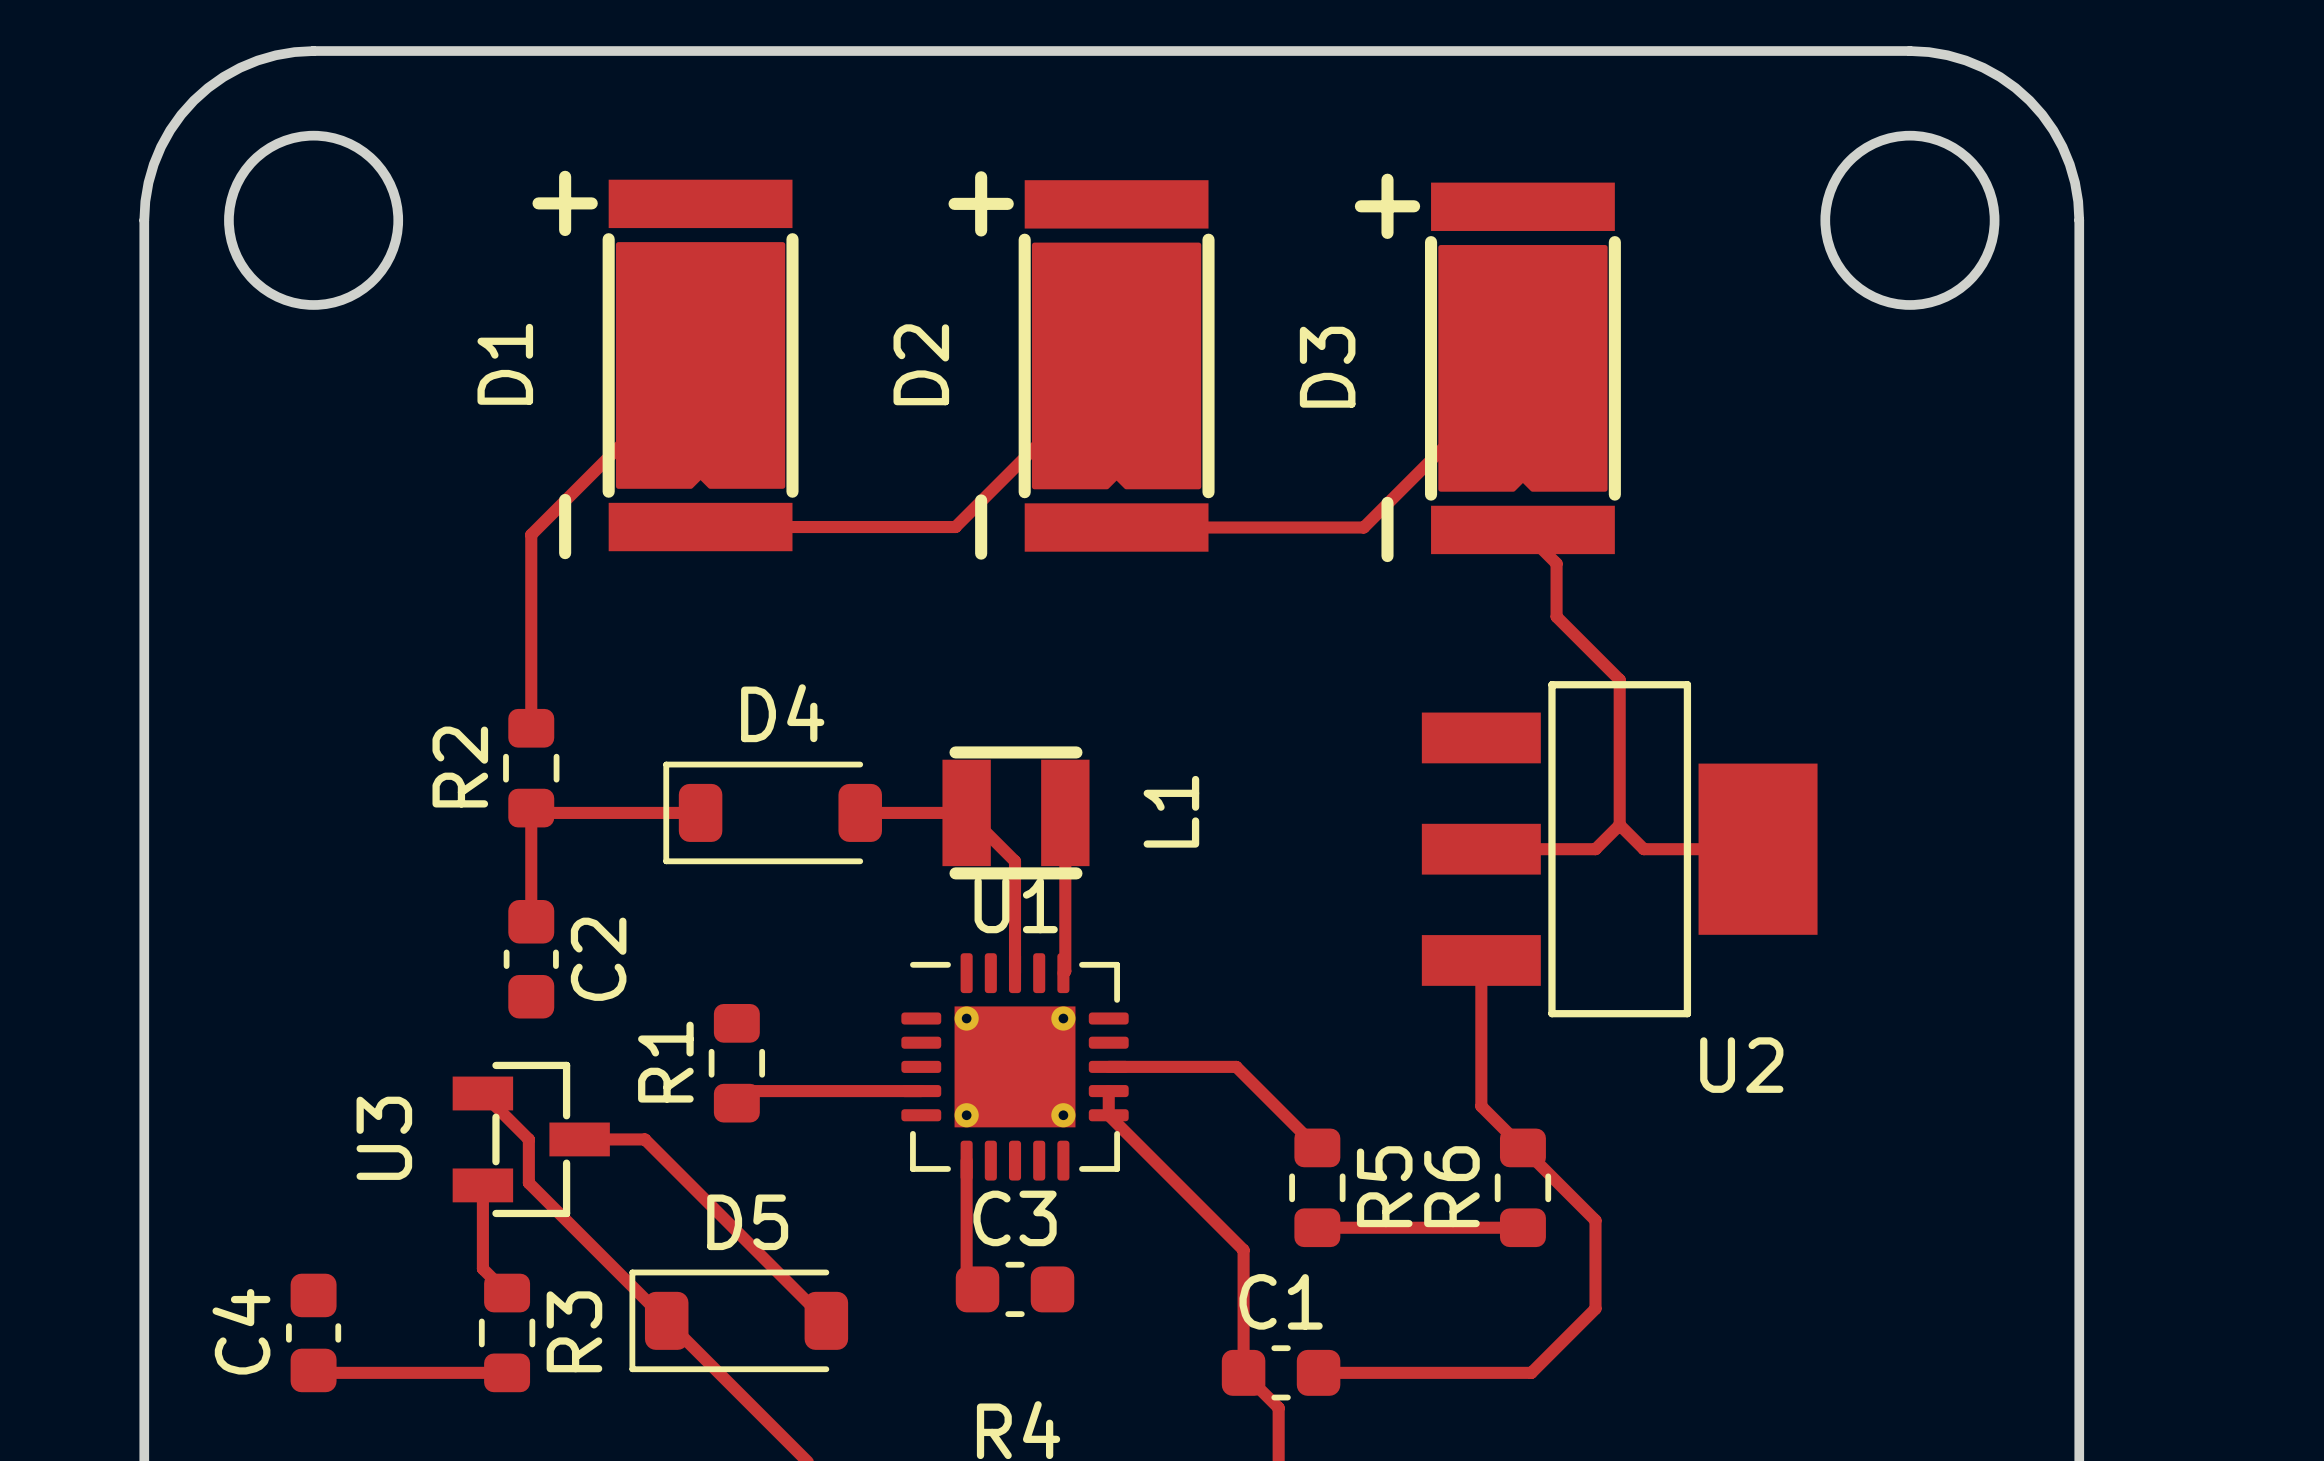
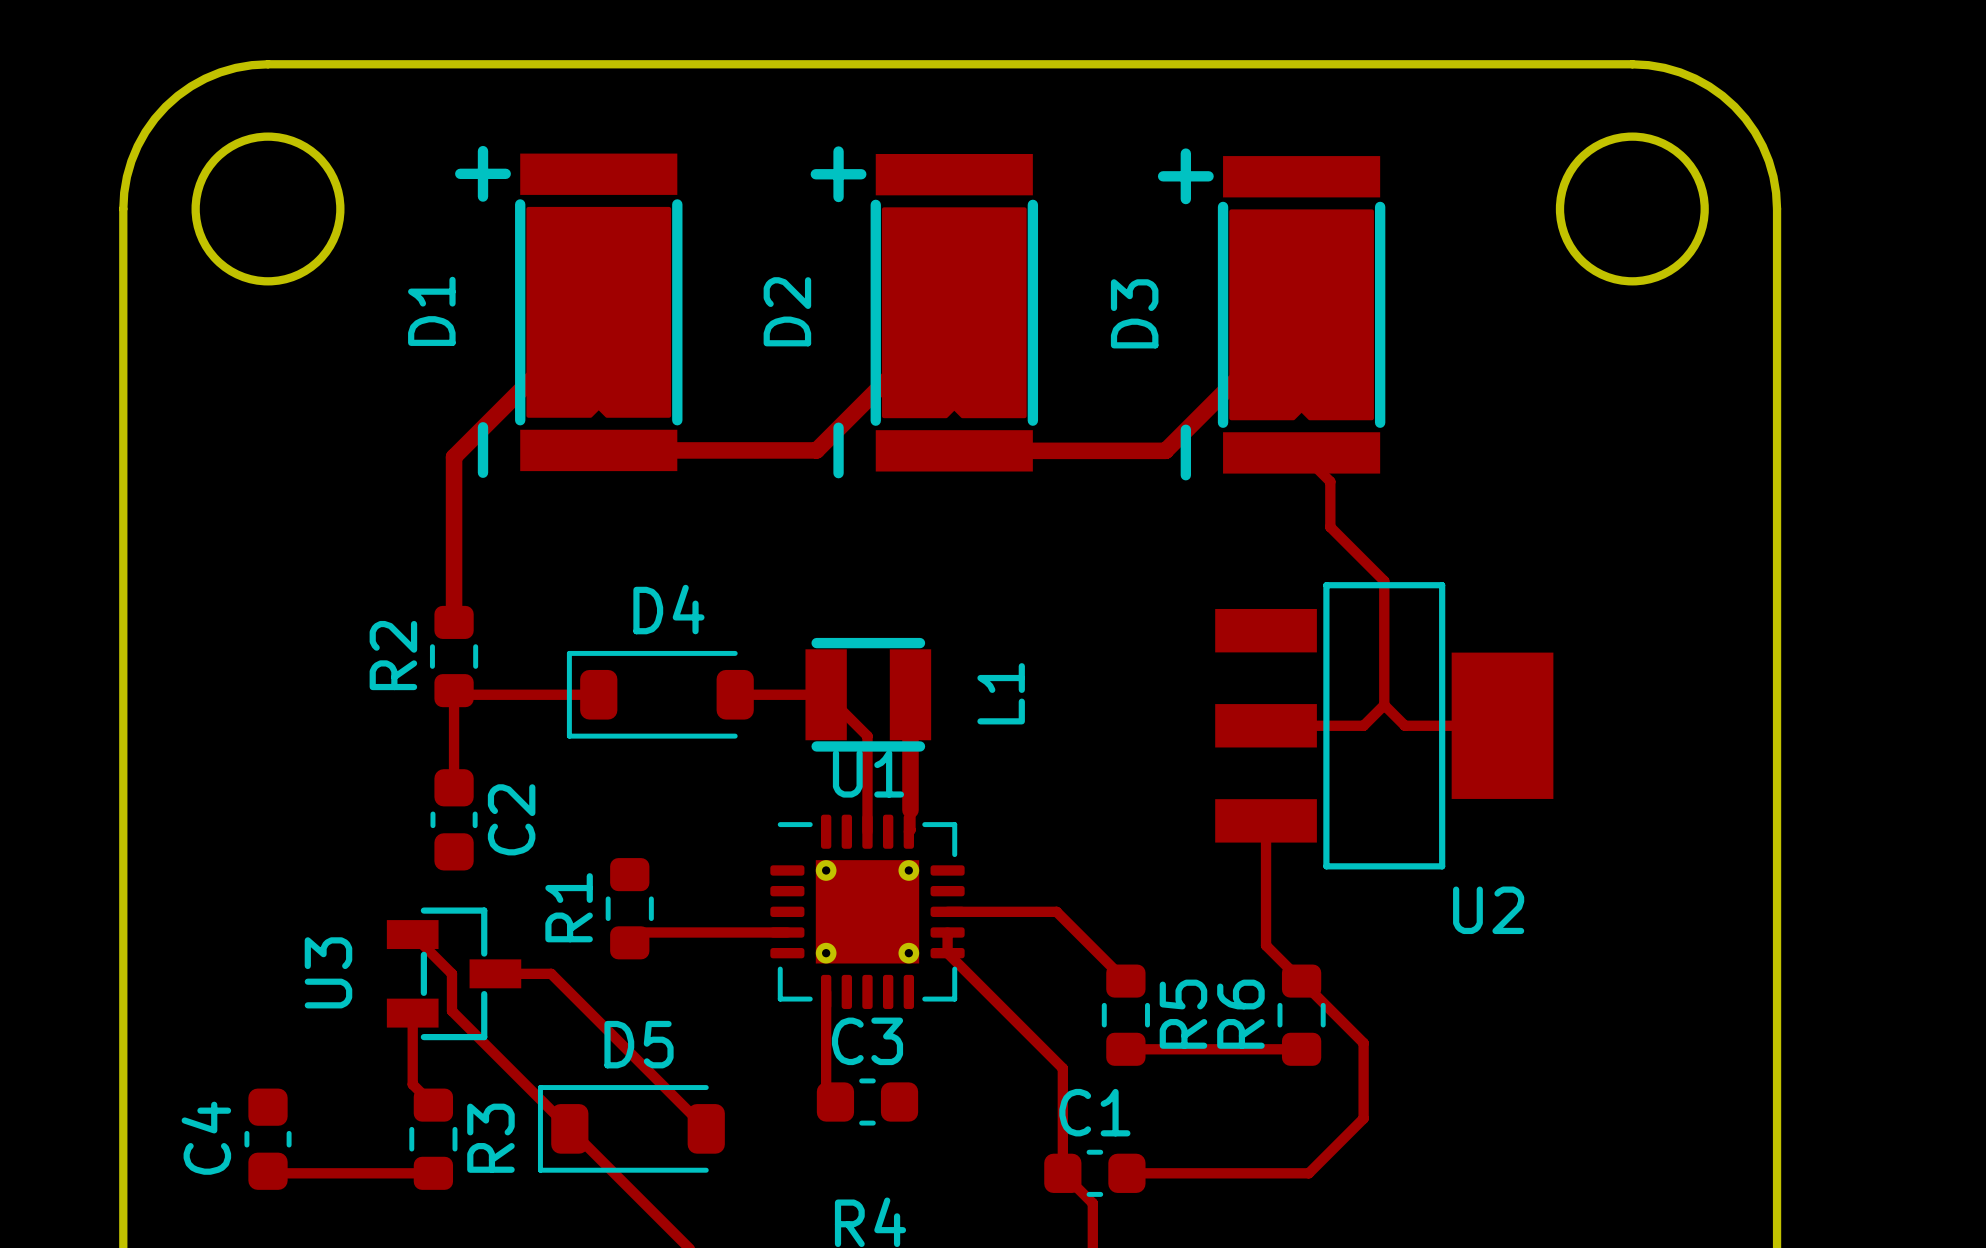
round board edge position: (313, 220) -> (268, 208)
round board edge position: (1909, 220) -> (1632, 208)
board edge: (144, 244) (145, 201) (148, 182) (161, 146) (181, 114) (208, 87) (240, 67) (275, 55) (313, 51) (1928, 52) (1965, 60) (2000, 76) (2029, 100) (2042, 114) (2062, 146) (2075, 182) (2078, 201) (2079, 244) -> (123, 208) (126, 176) (137, 146) (154, 118) (165, 106) (191, 86) (220, 72) (251, 65) (268, 64) (1648, 65) (1680, 72) (1695, 78) (1709, 86) (1734, 106) (1754, 131) (1762, 146) (1773, 176) (1777, 208)
track width: thin (700, 365) (531, 534) (531, 728) -> thick (598, 312) (454, 457) (454, 622)
track width: thin (1116, 365) (955, 527) (700, 527) -> thick (954, 312) (816, 450) (598, 450)
track width: thin (1522, 368) (1363, 527) (1116, 527) -> thick (1301, 314) (1165, 450) (954, 450)
track width: thin (1065, 812) (1065, 947) -> thick (910, 694) (910, 810)

